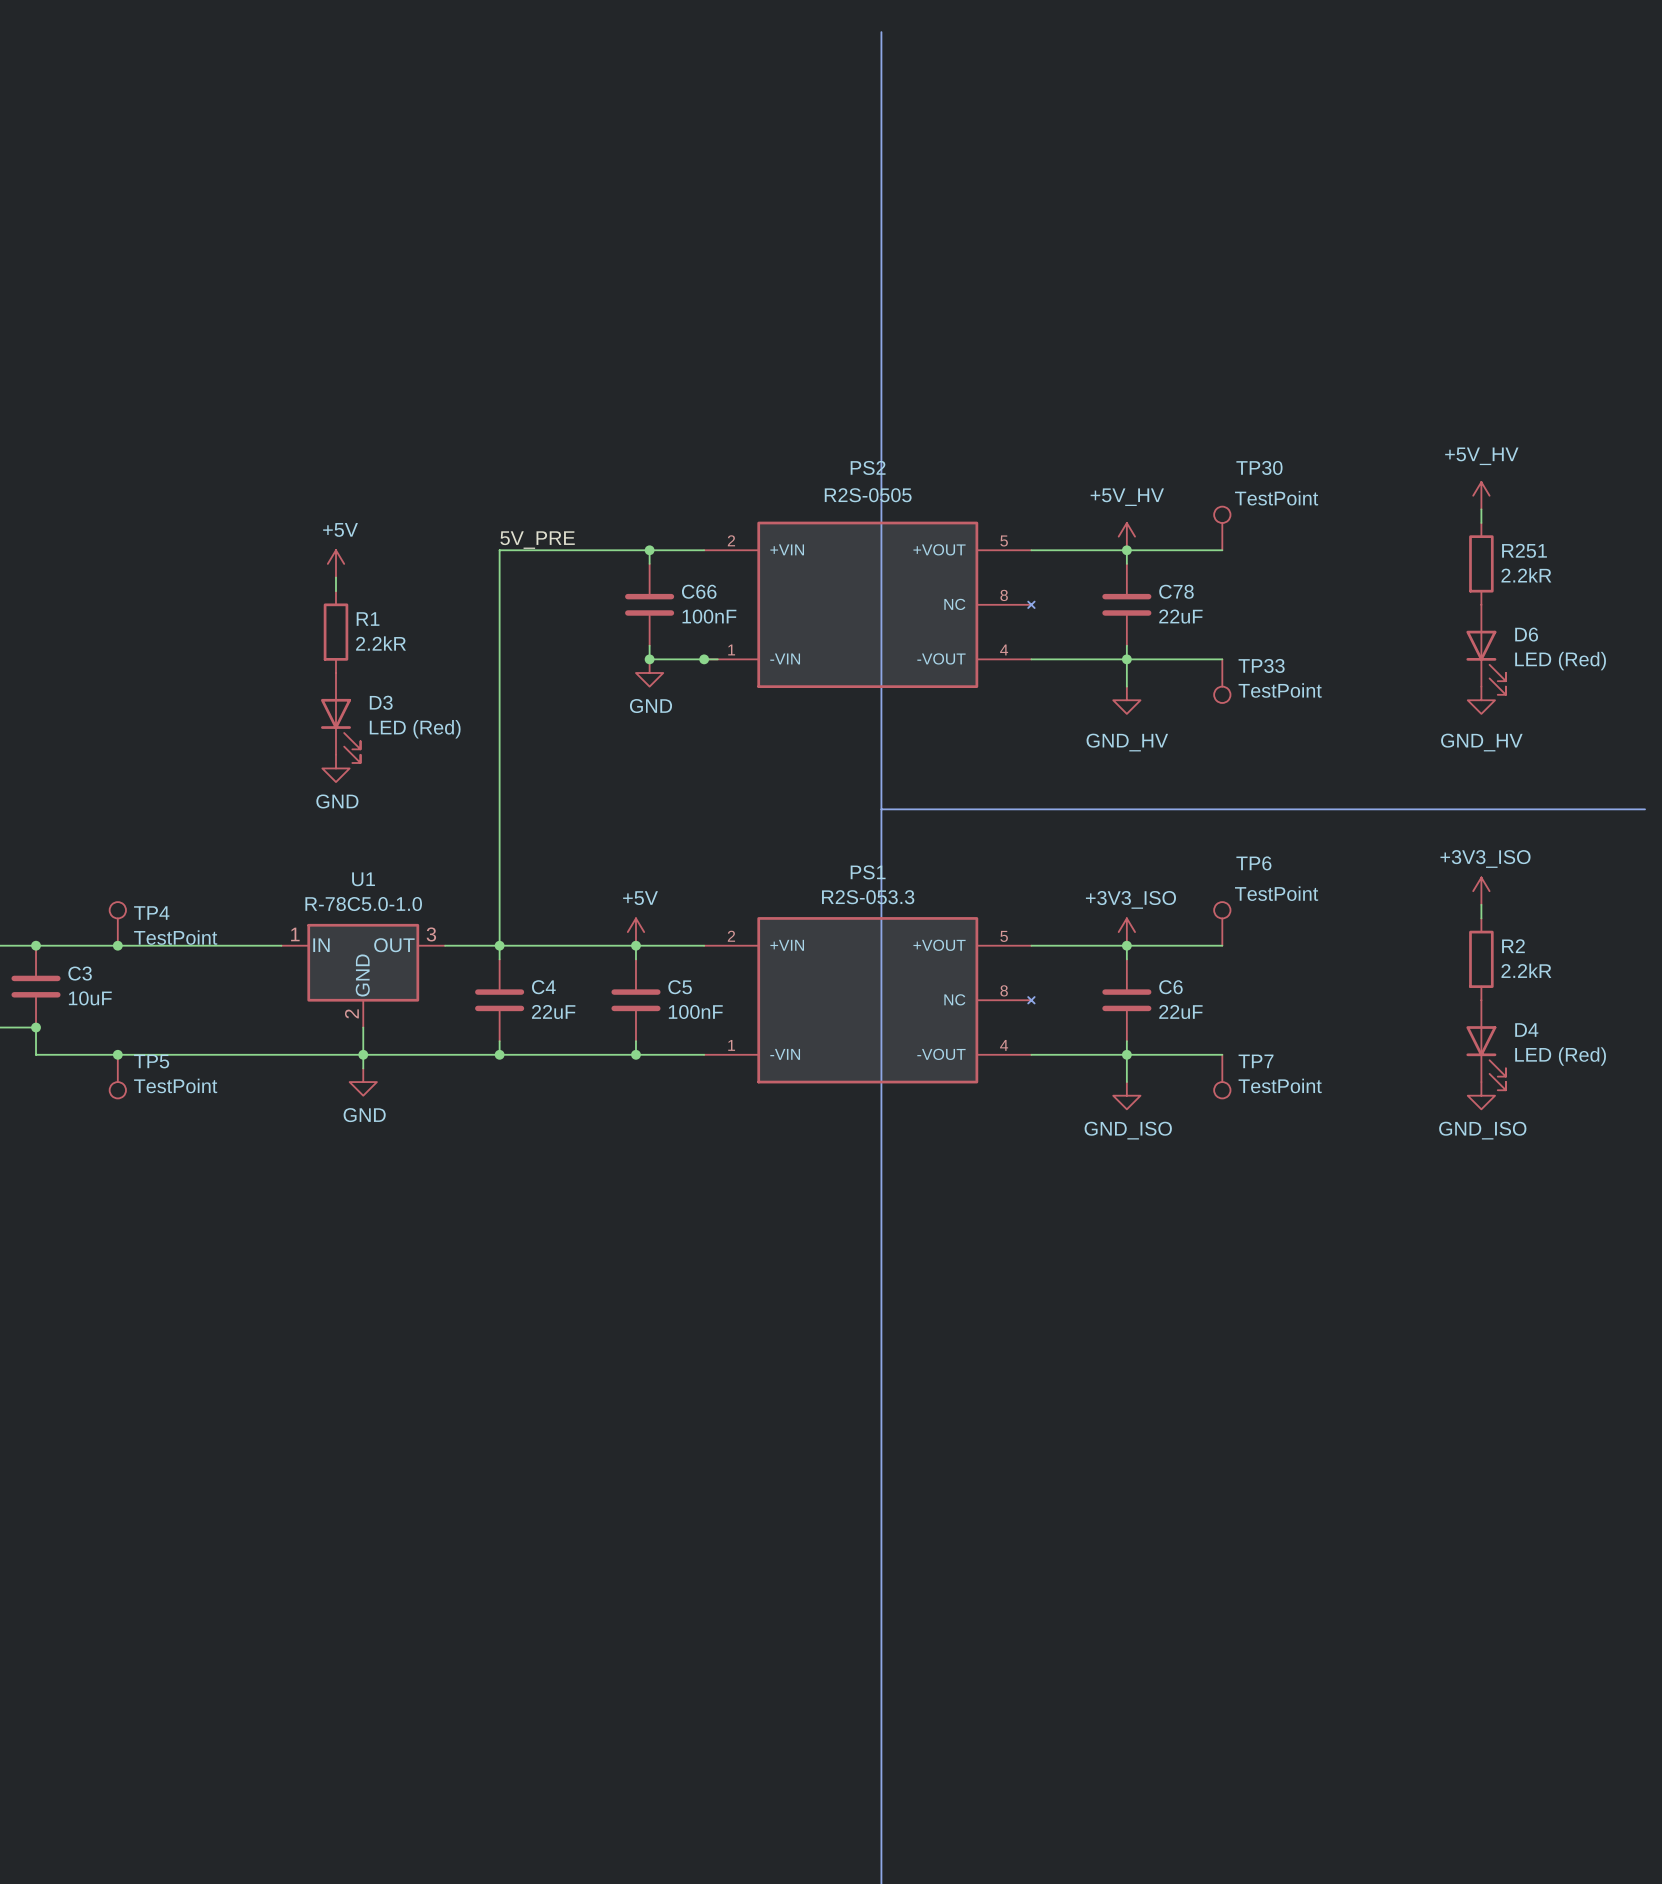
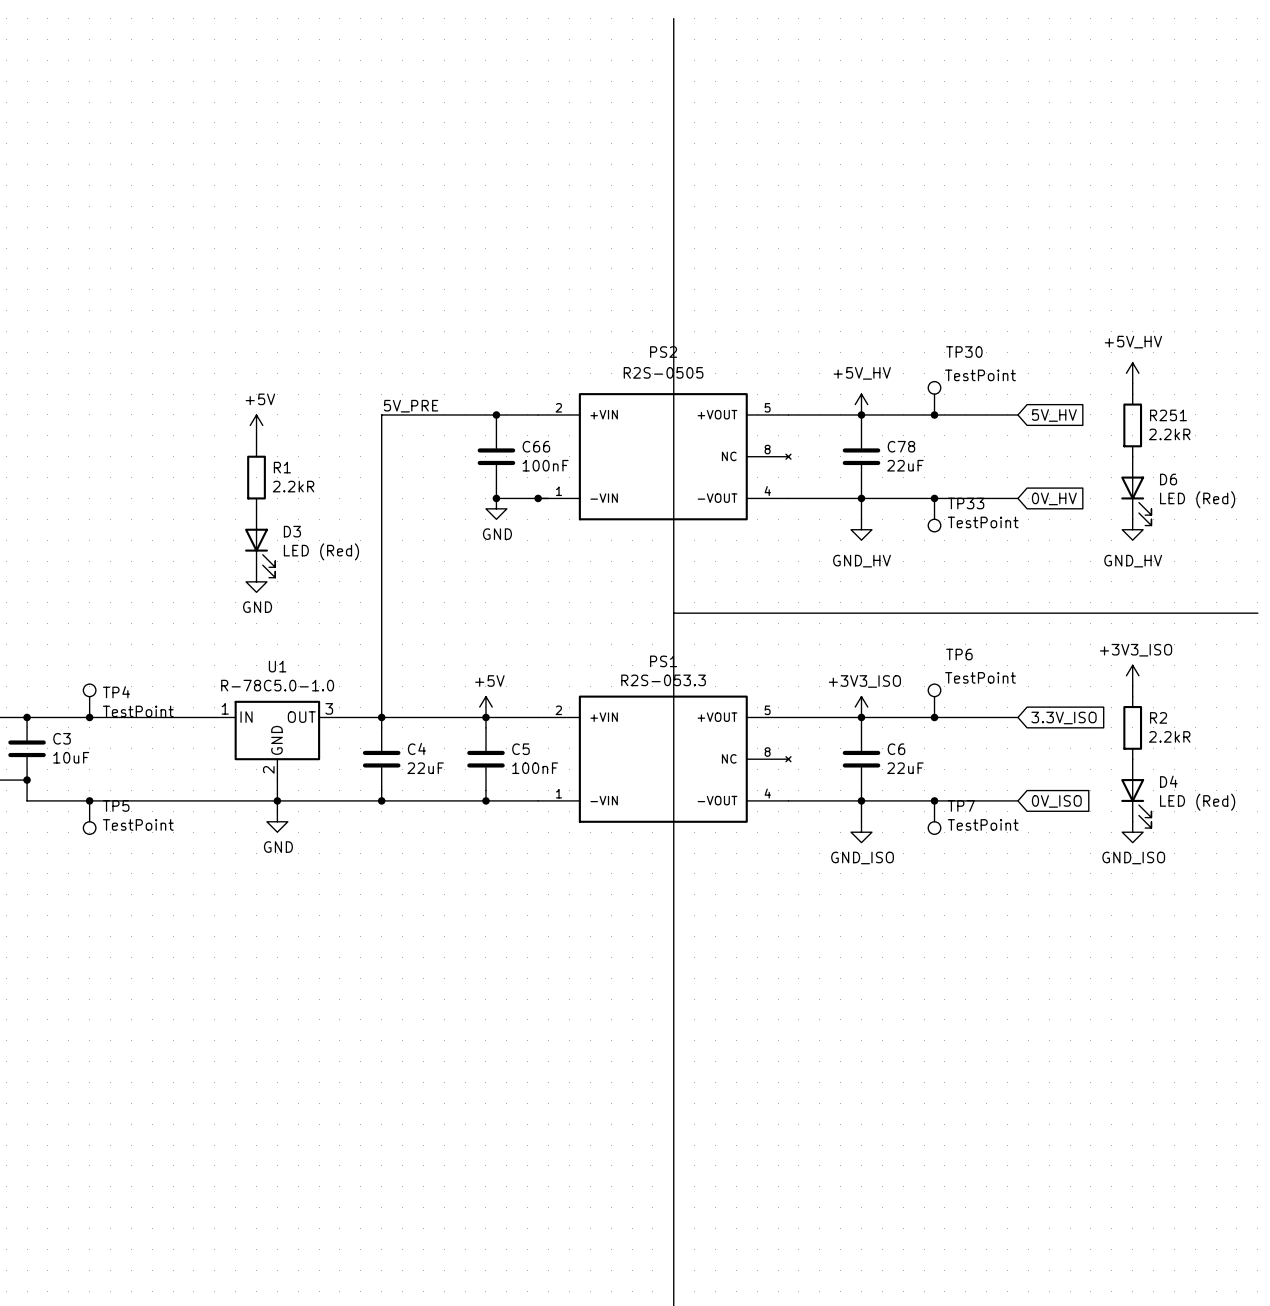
wire: none -> (934, 414) (1017, 414)
junction: none -> (934, 414)
global label: none -> 5V_HV (1054, 415)
wire: none -> (934, 498) (1017, 498)
junction: none -> (934, 498)
global label: none -> 0V_HV (1054, 498)
wire: none -> (934, 717) (1017, 717)
junction: none -> (934, 717)
global label: none -> 3.3V_ISO (1064, 717)
wire: none -> (934, 800) (1017, 800)
junction: none -> (934, 800)
global label: none -> 0V_ISO (1056, 801)

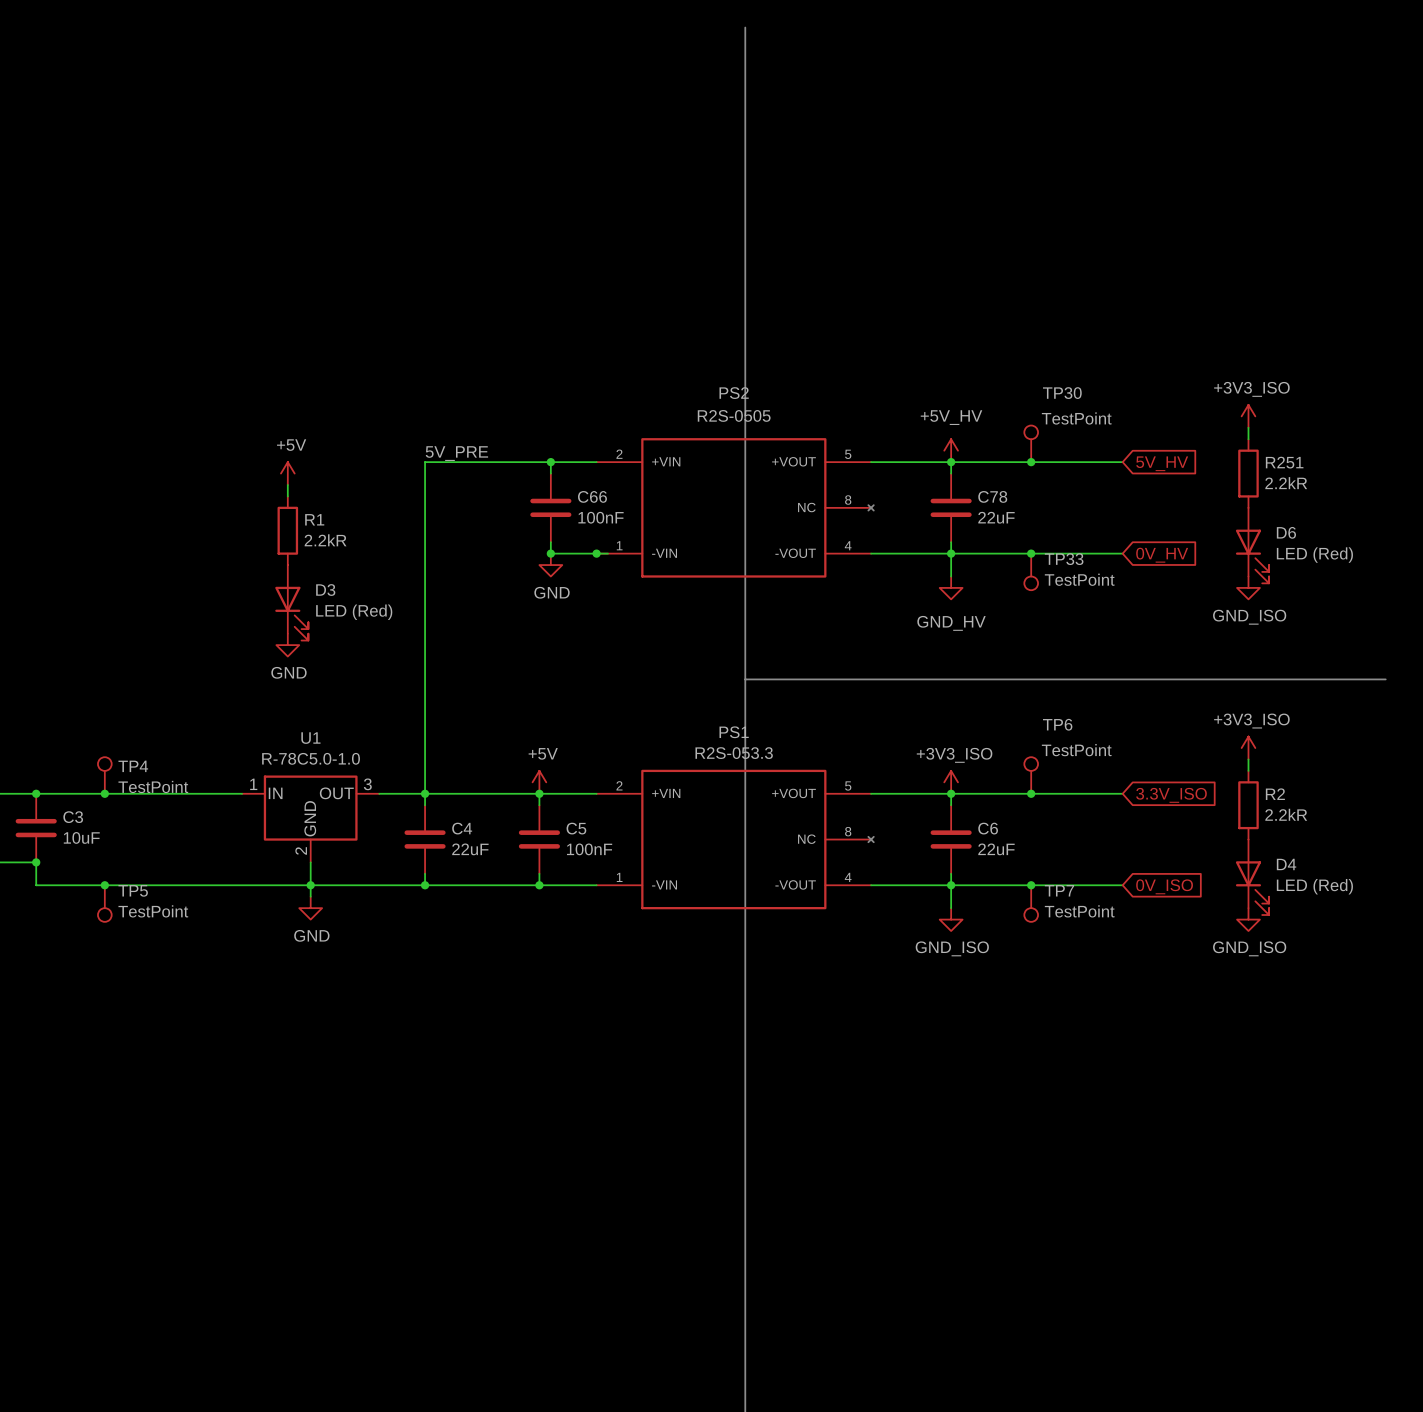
power symbol: +5V_HV (1132, 373) -> +3V3_ISO (1248, 416)
power symbol: GND_HV (1132, 529) -> GND_ISO (1248, 587)

